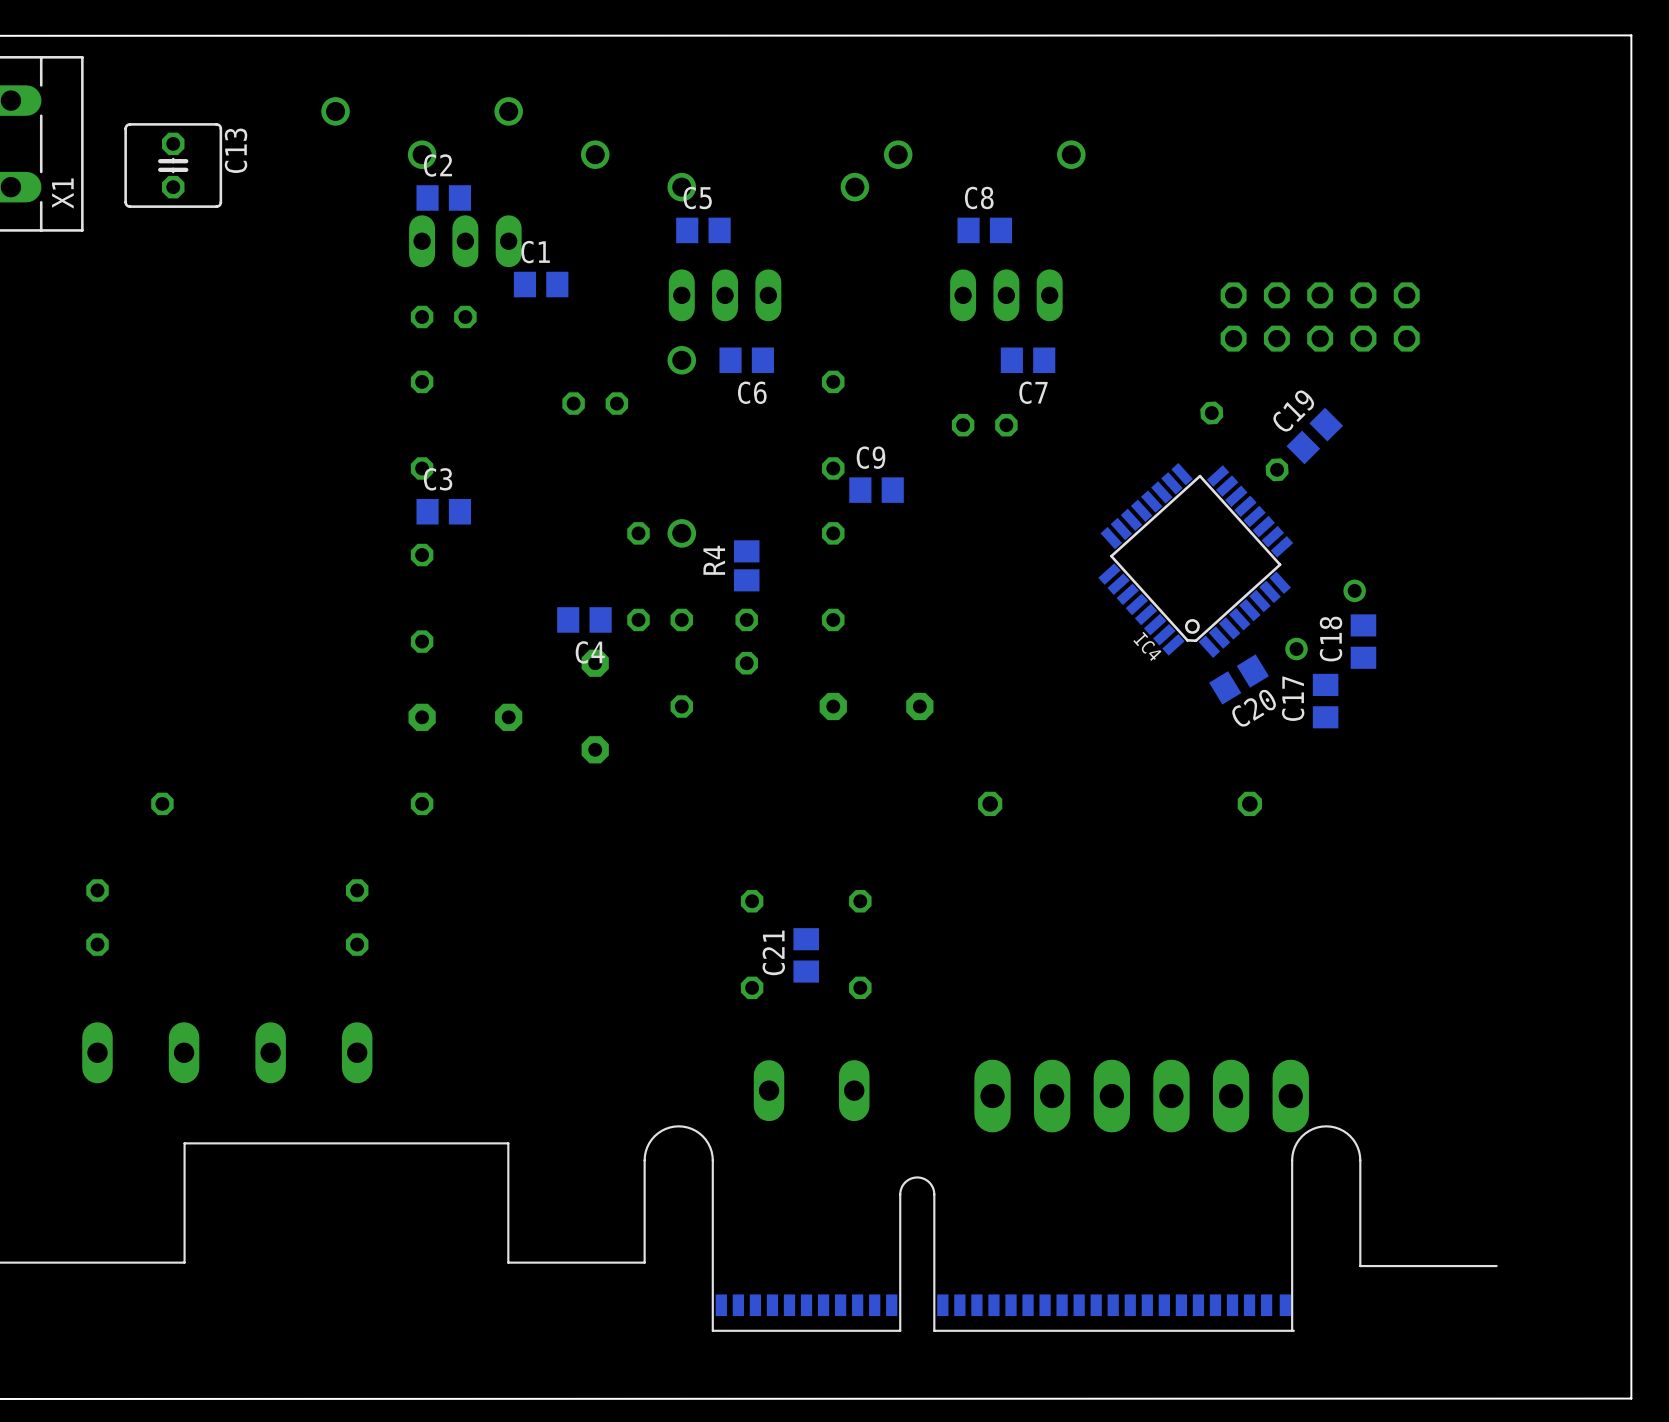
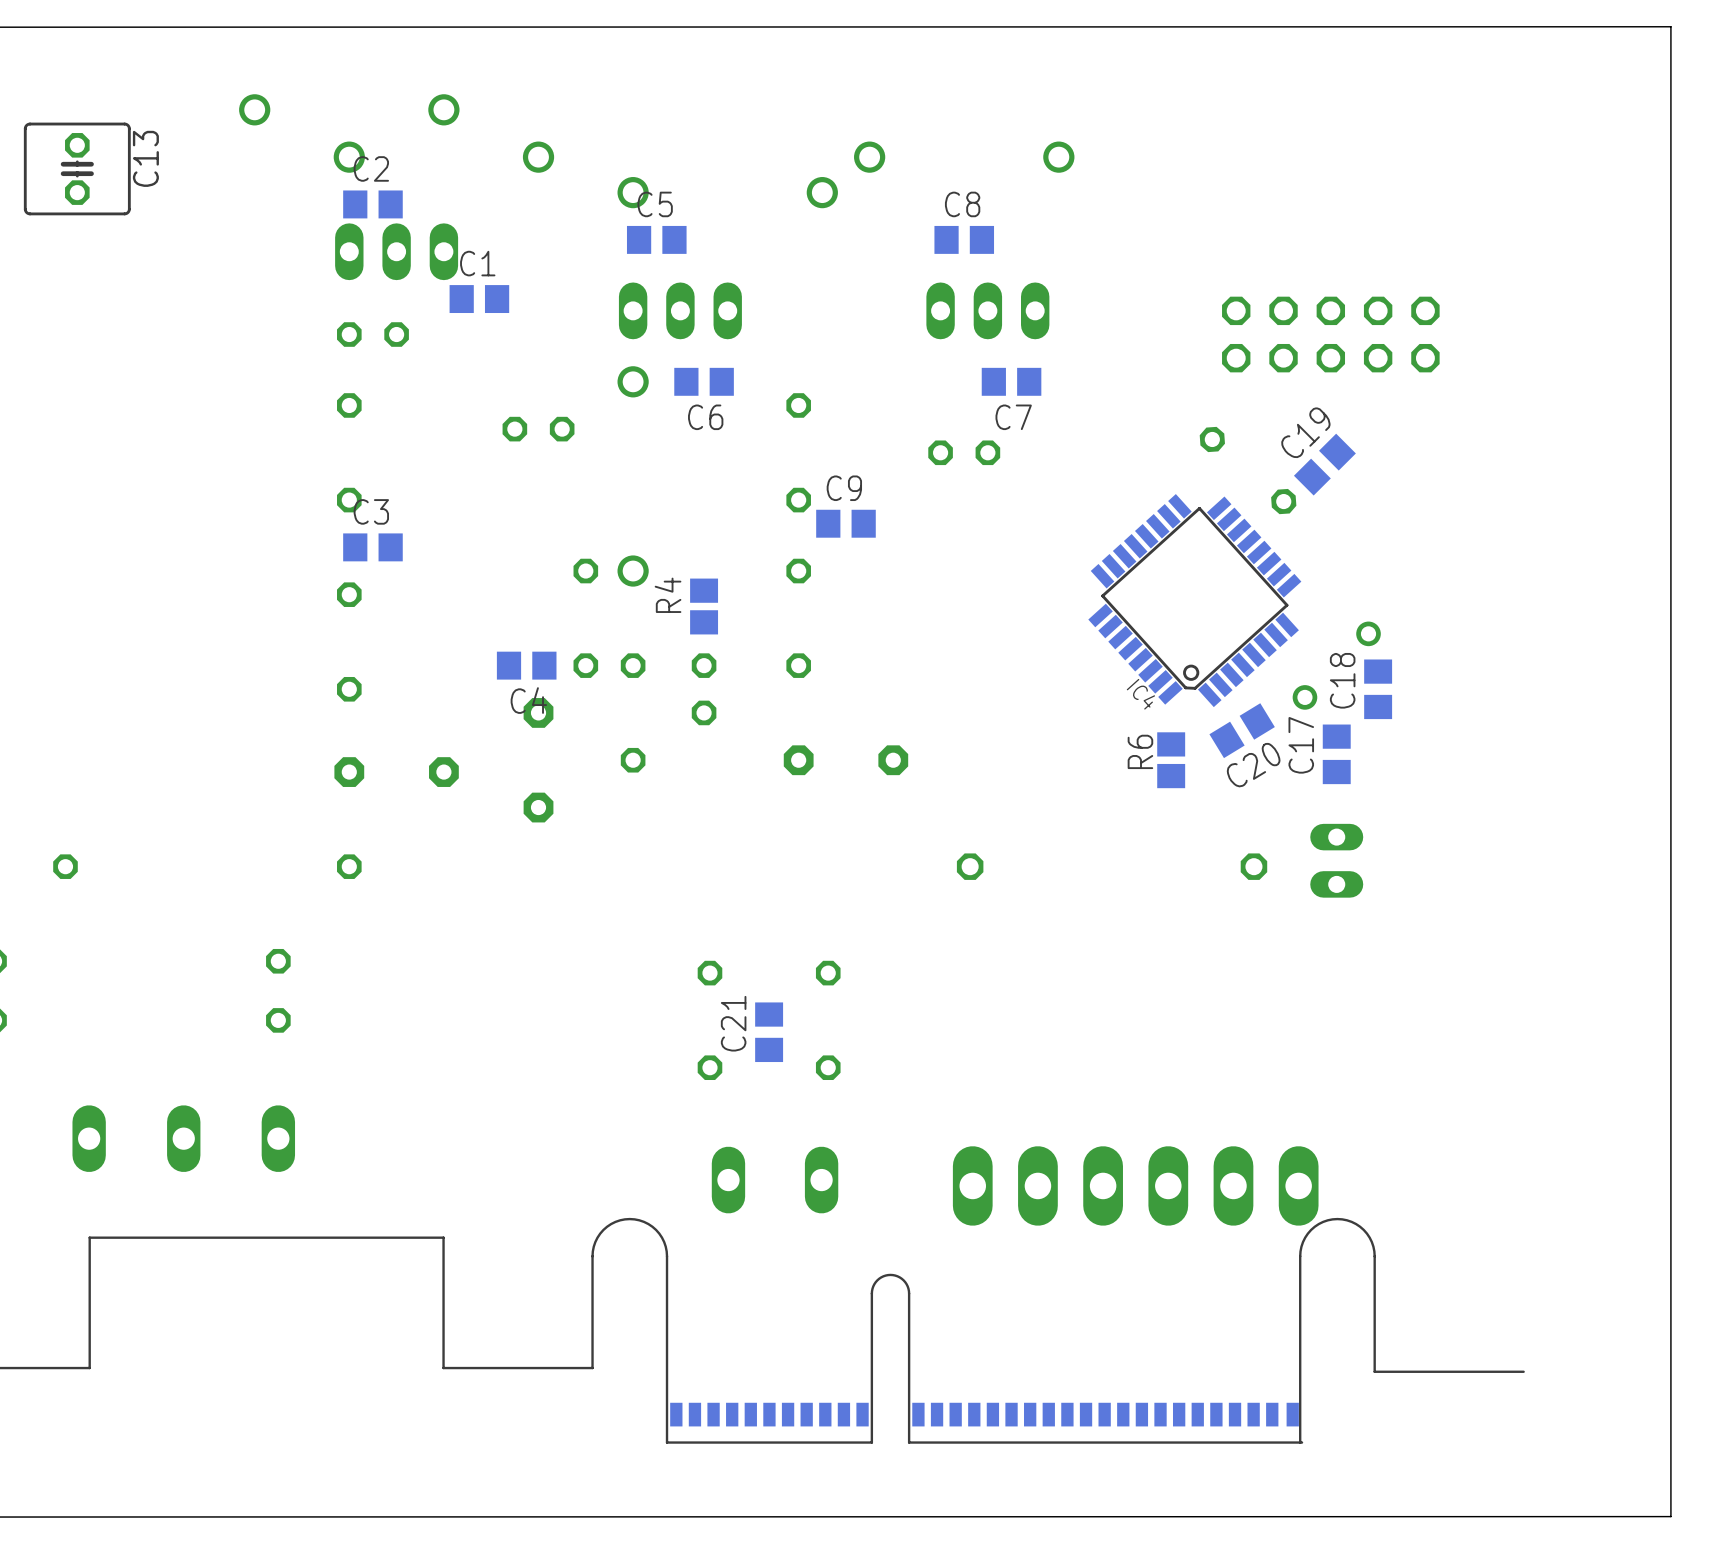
R6: none -> (1171, 760)
part: none -> (1336, 860)

